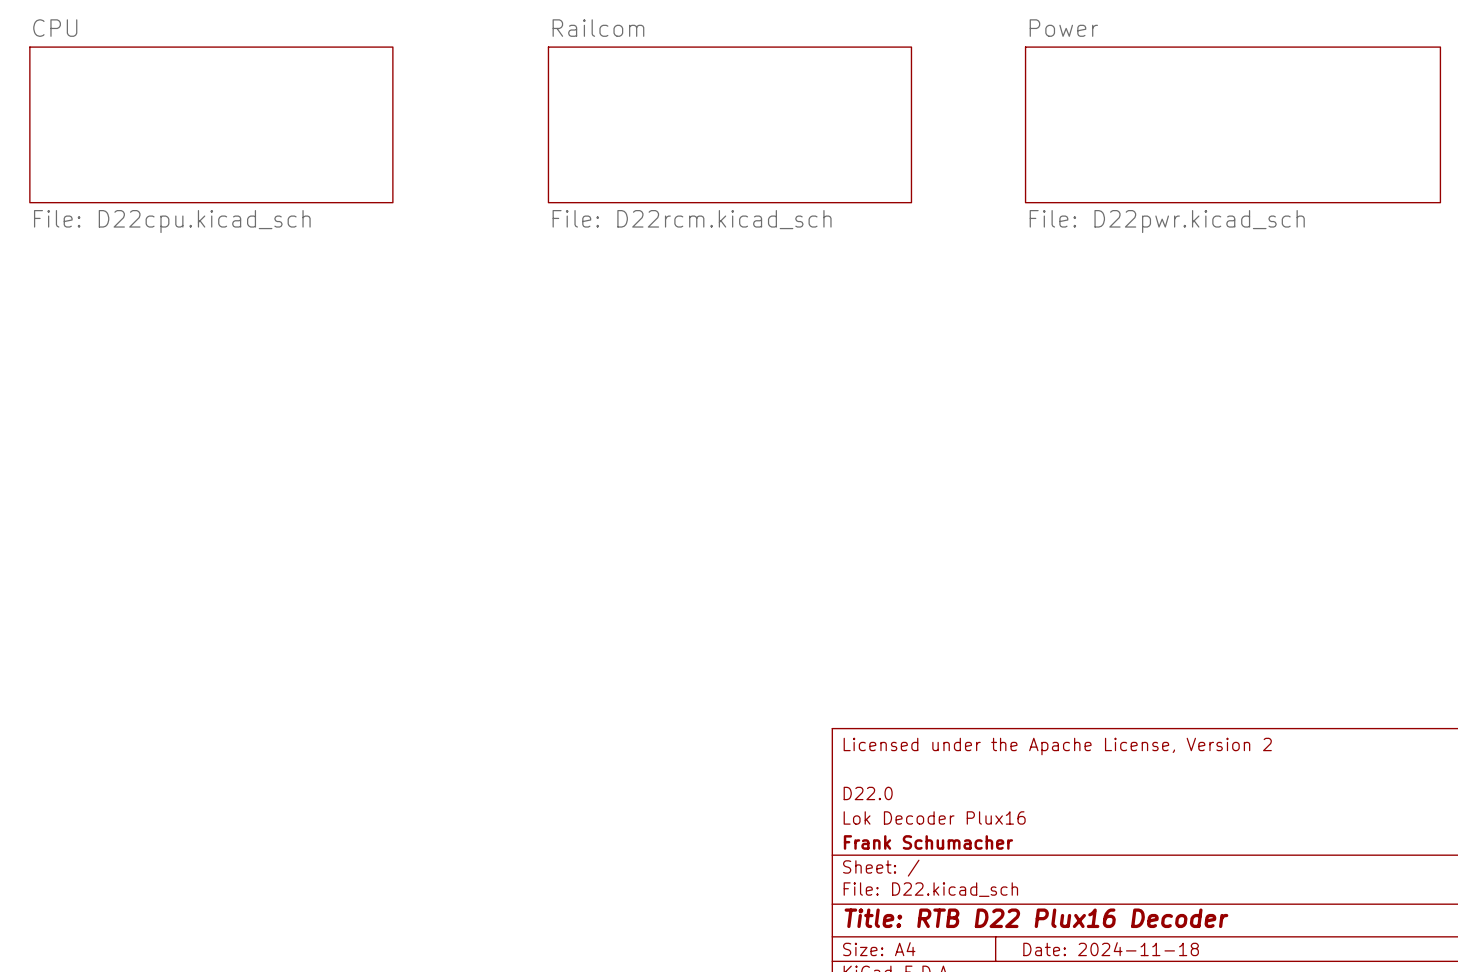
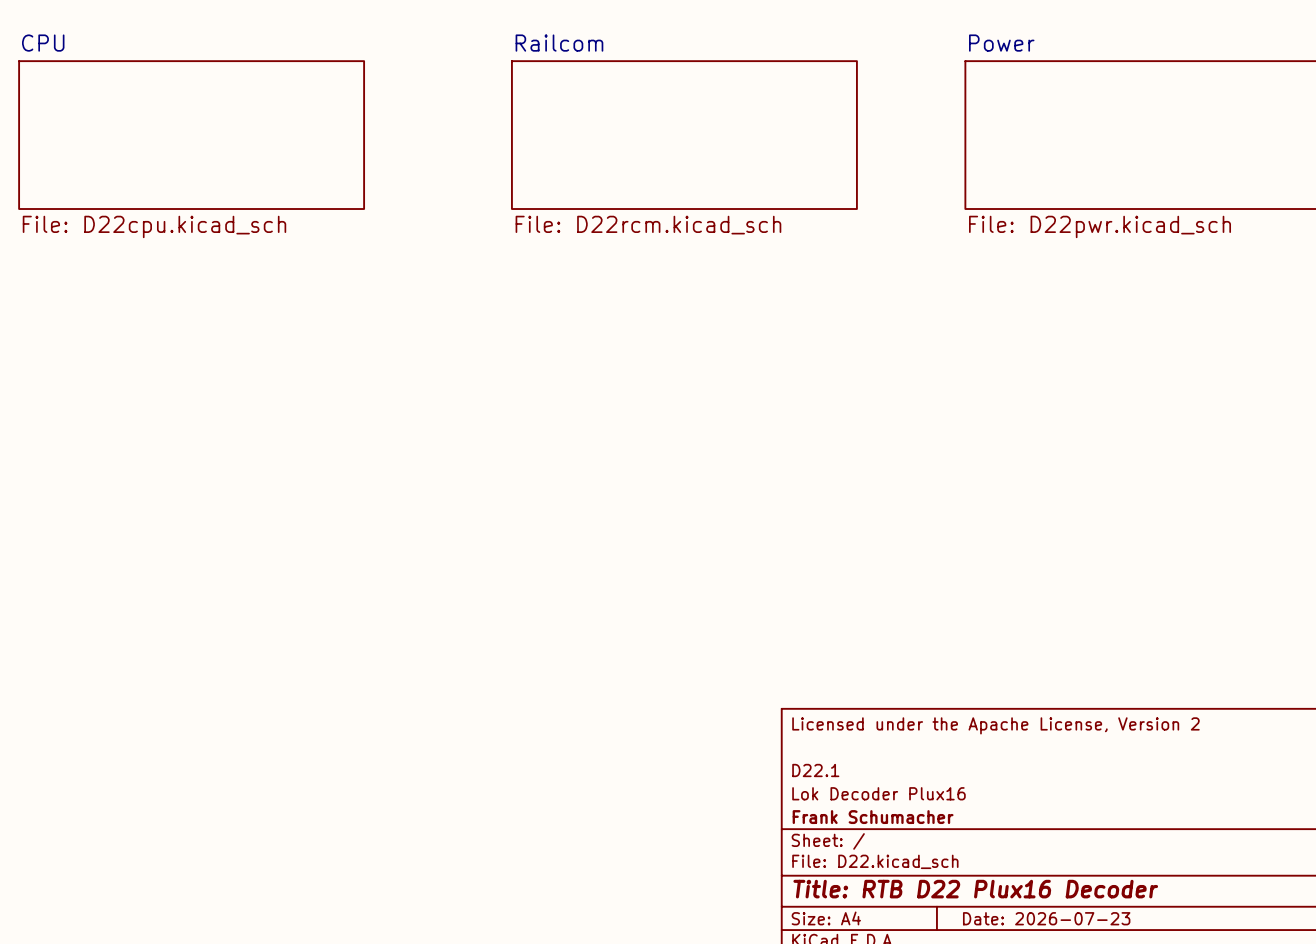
title block: D22.0 (868, 793) -> D22.1 (815, 770)
title block: Date: 2024-11-18 (1111, 949) -> Date: 2026-07-23 (1046, 918)

